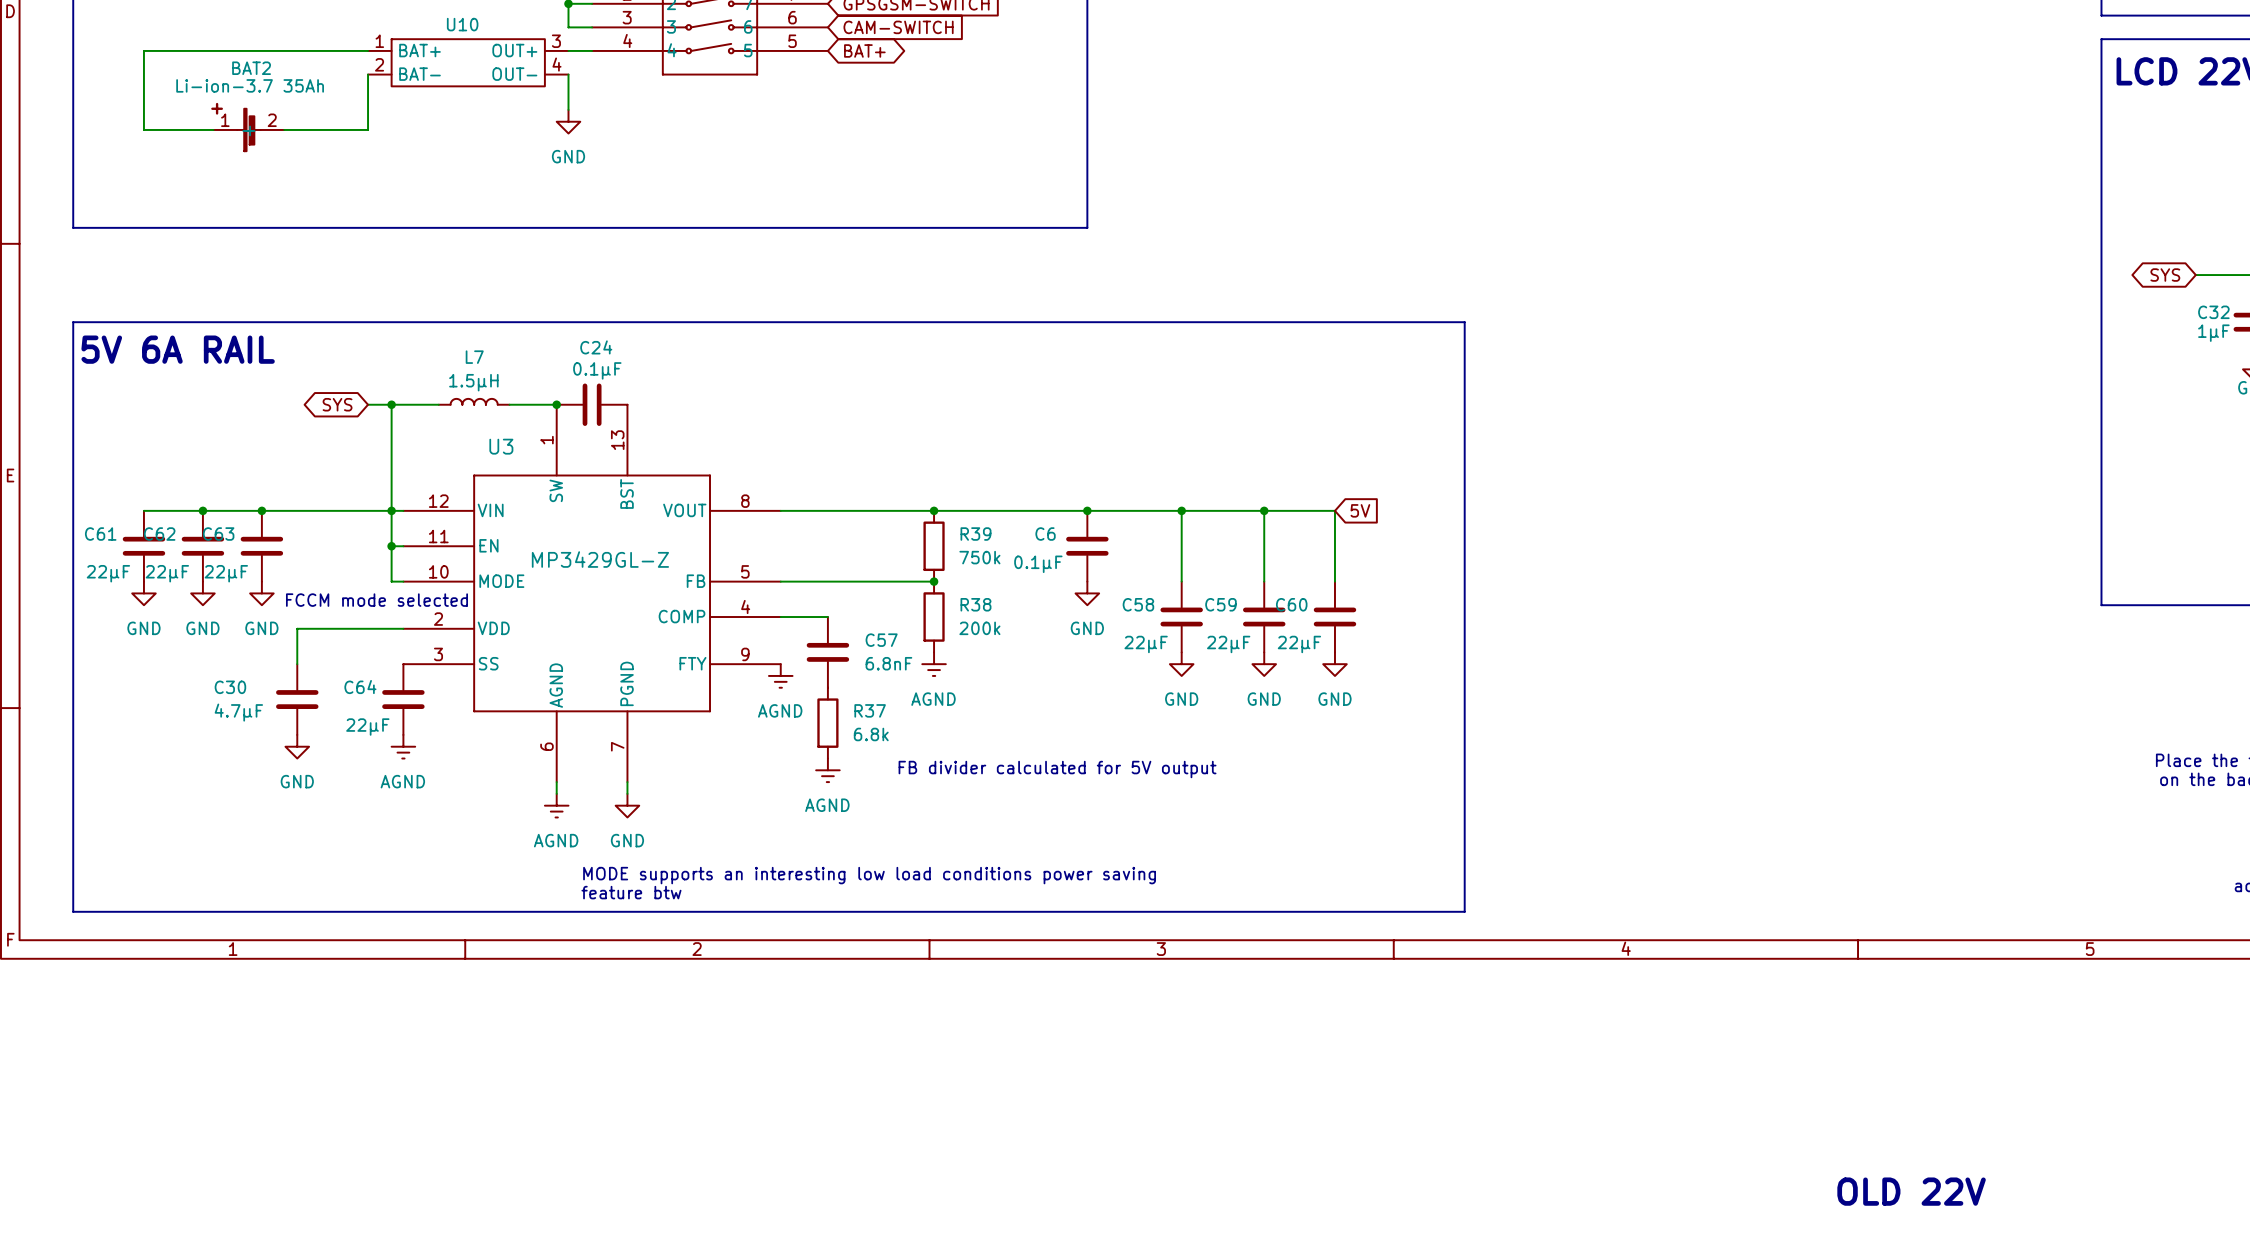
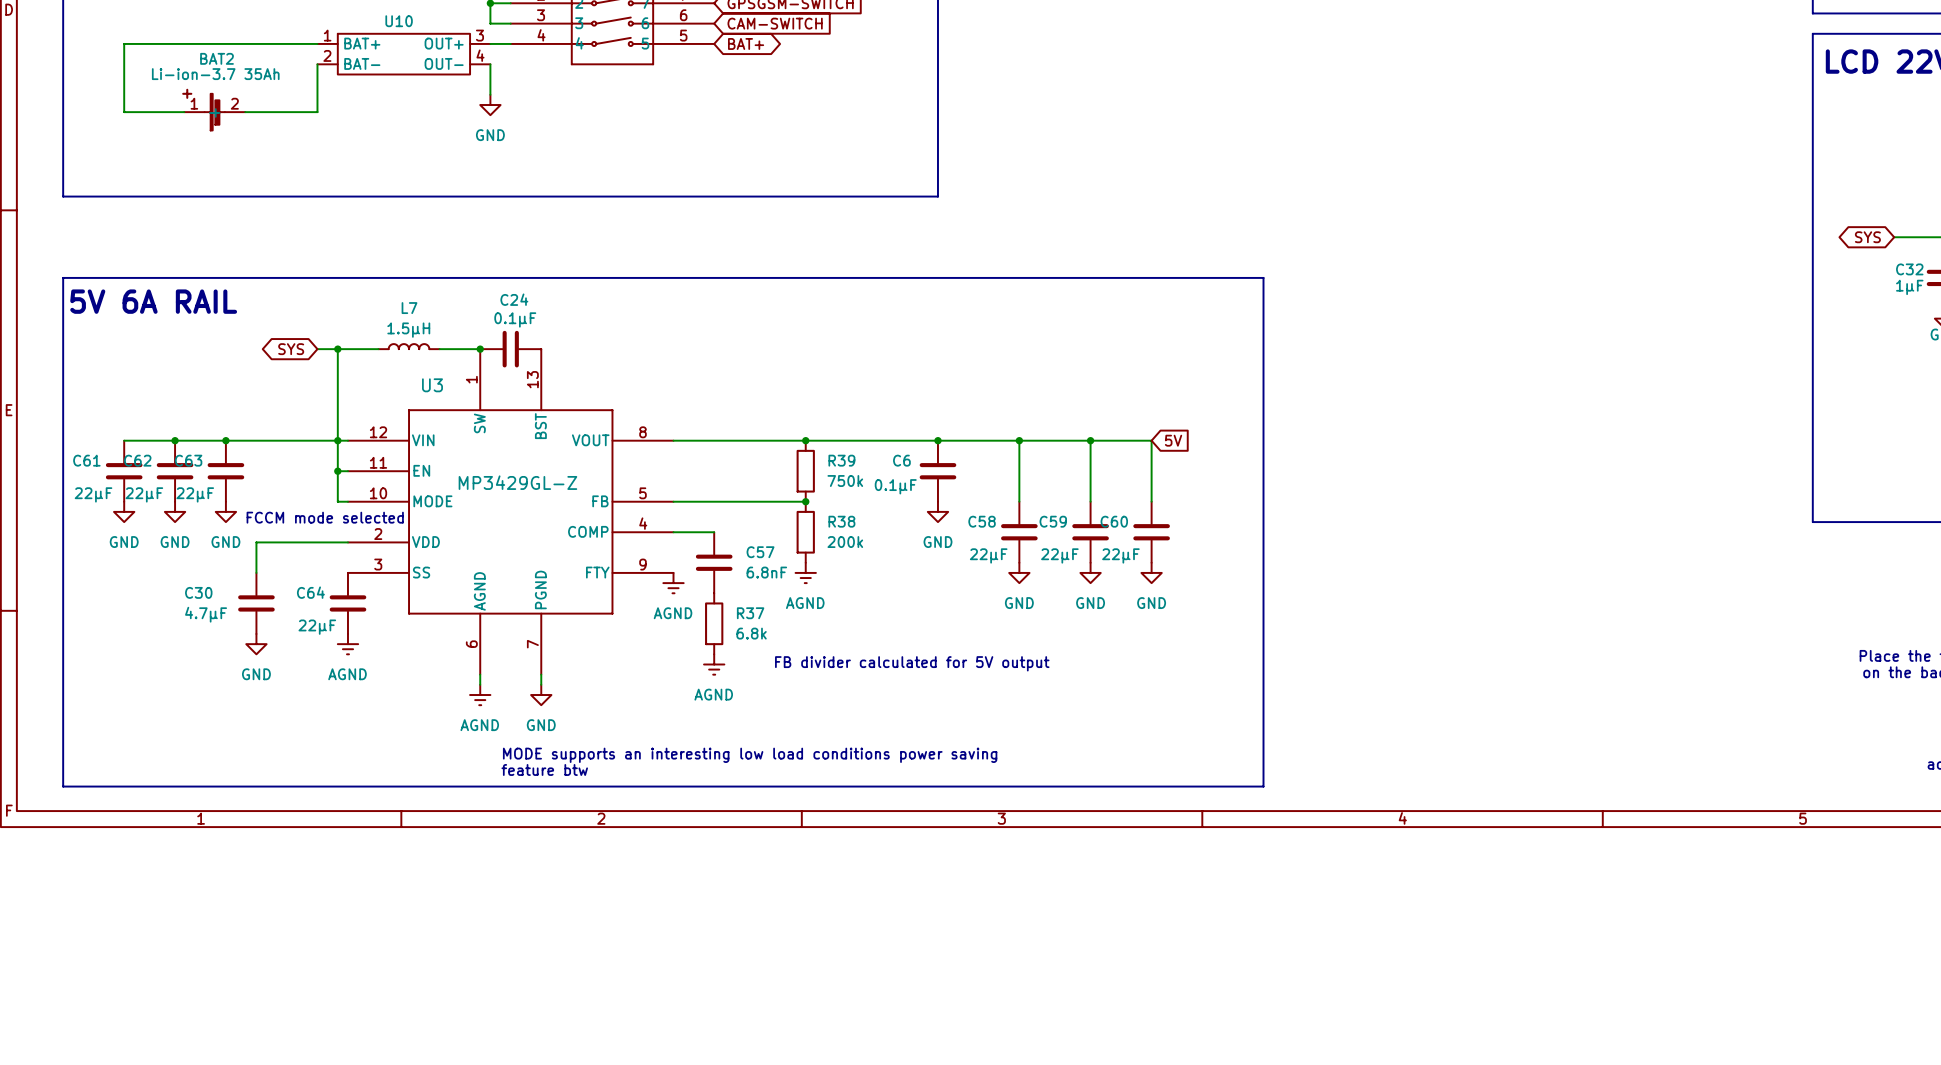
text: OLD 22V (1911, 1191) -> none

